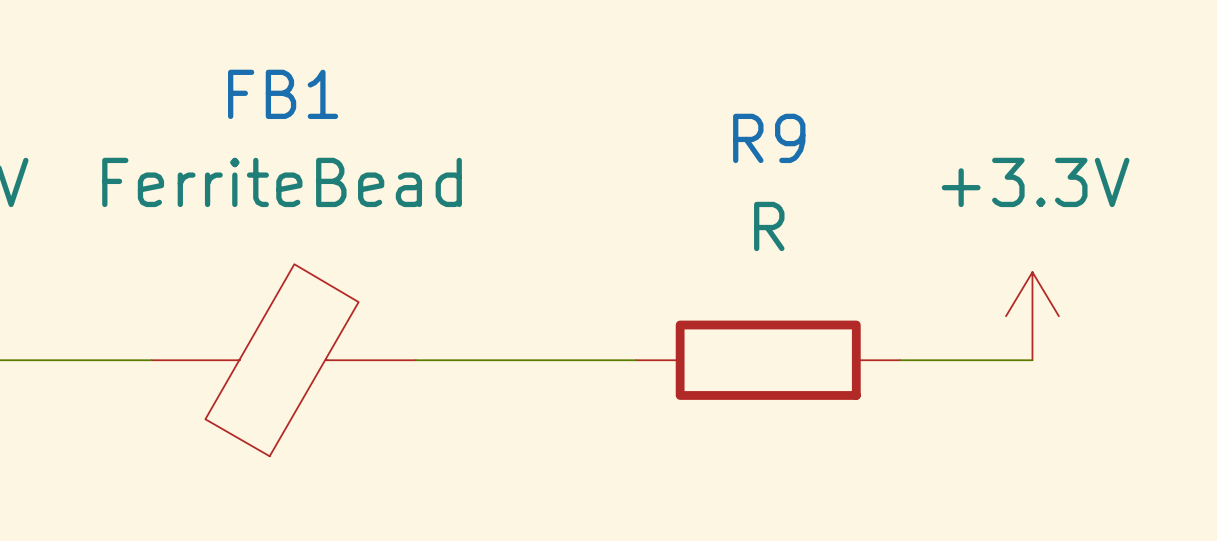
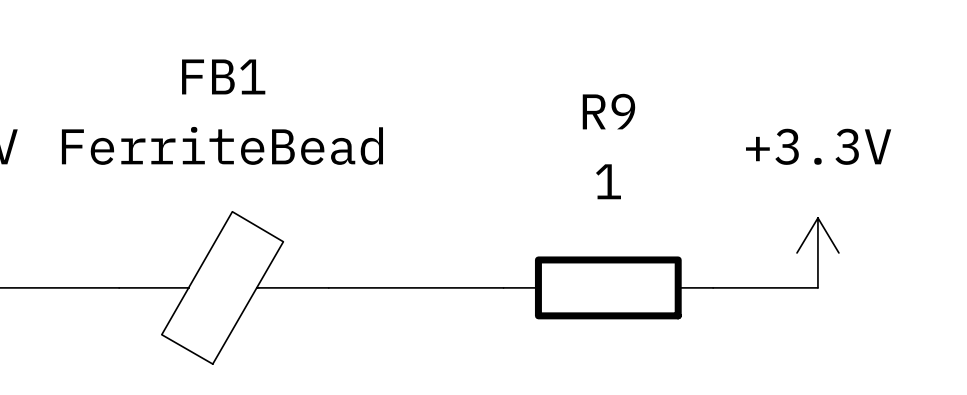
R9 value: R (769, 226) -> 1 (608, 181)

